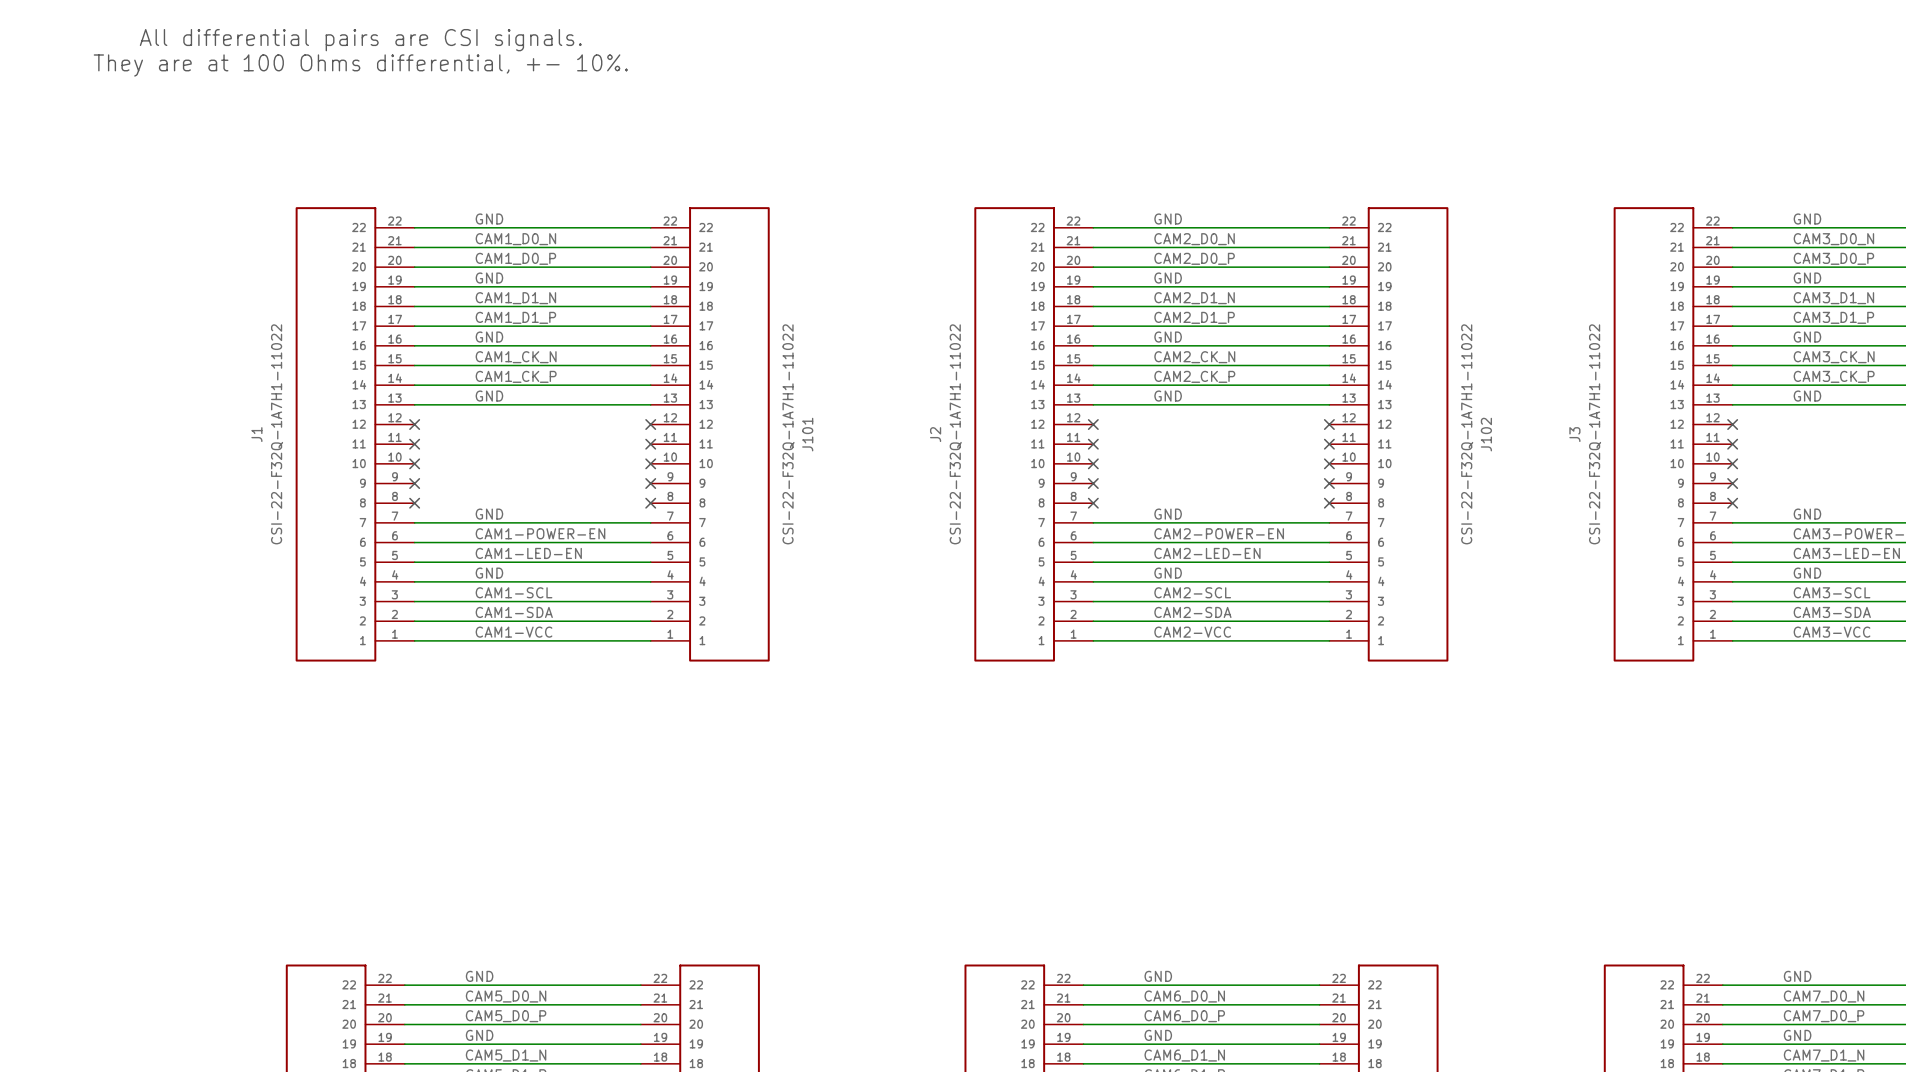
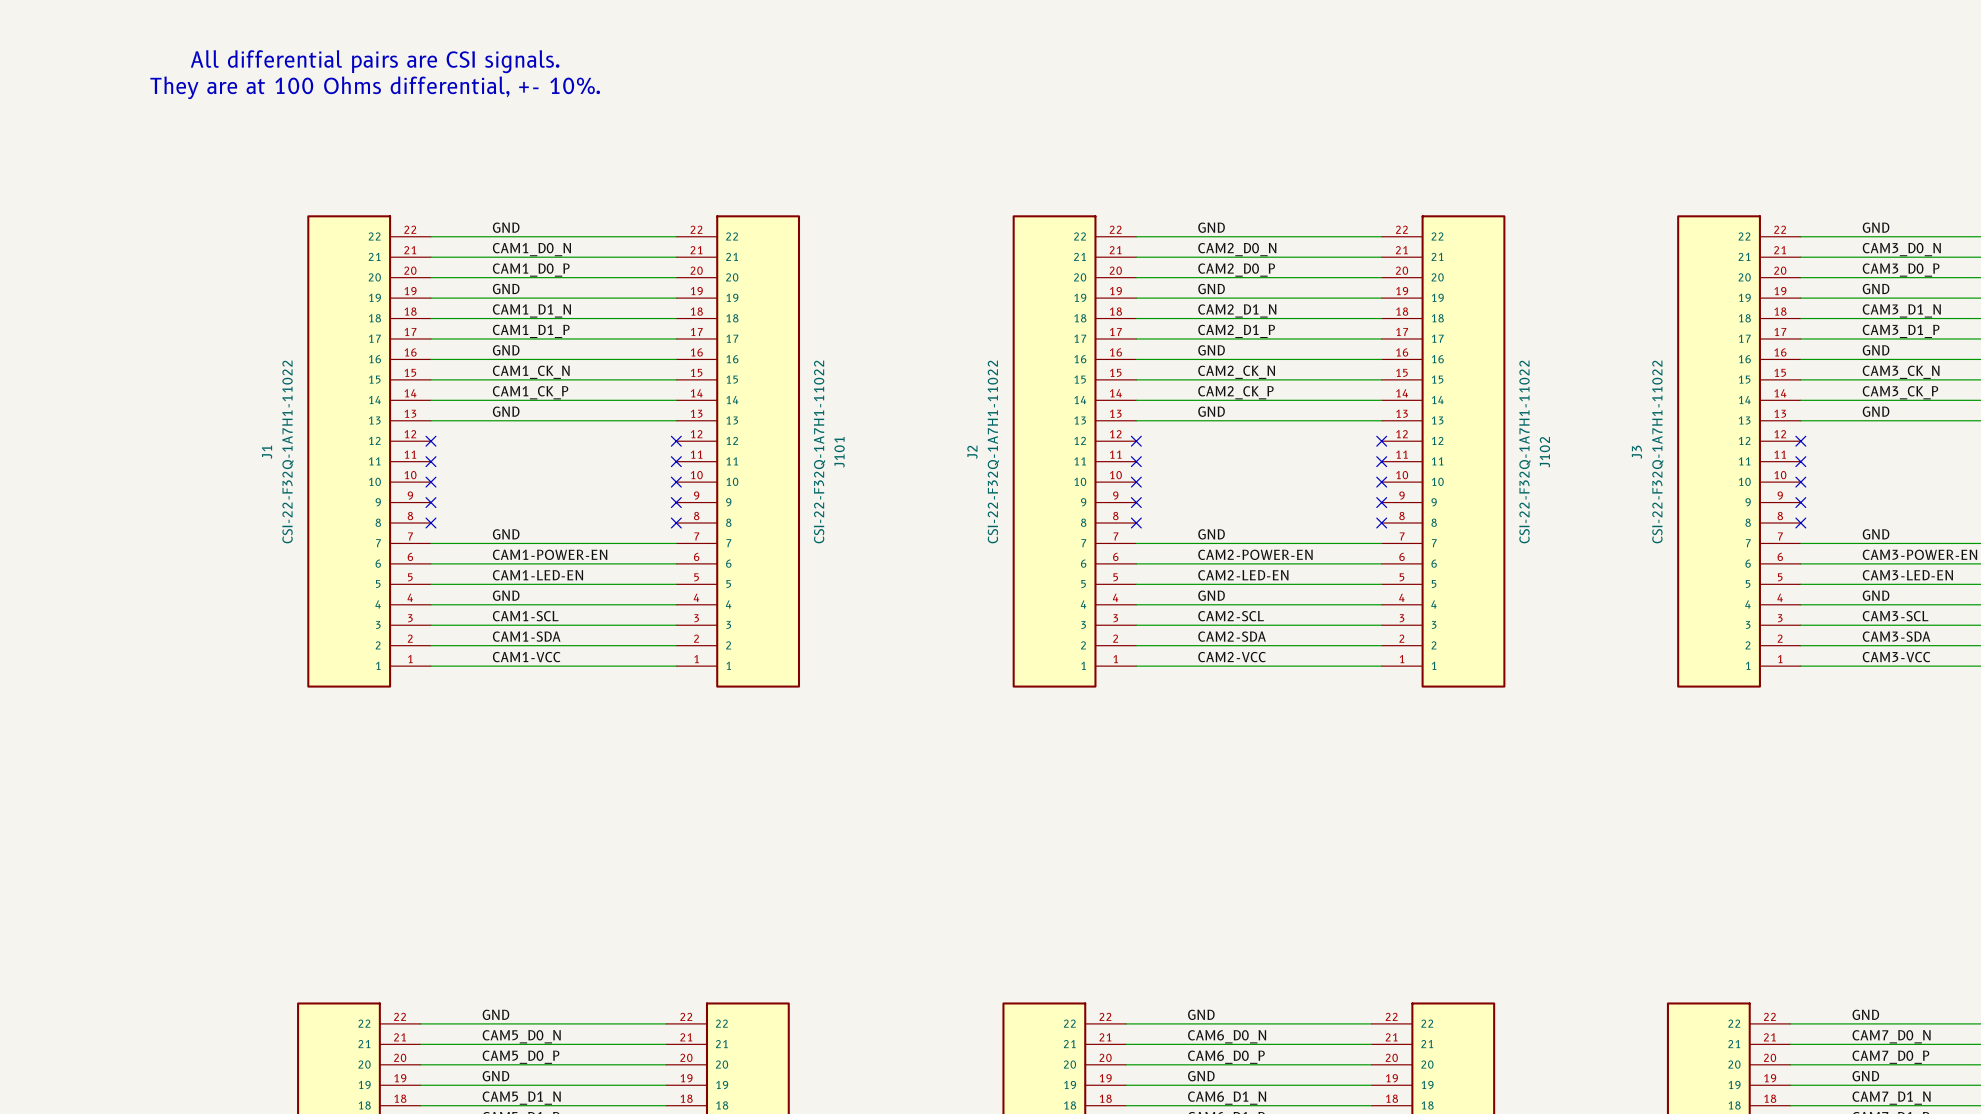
text: All differential pairs are CSI signals. (360, 40) -> none
text: They are at 100 Ohms differential, +- 10%. (360, 65) -> All differential pairs are CSI signals. (375, 61)
text: none -> They are at 100 Ohms differential, +- 10%. (375, 87)

